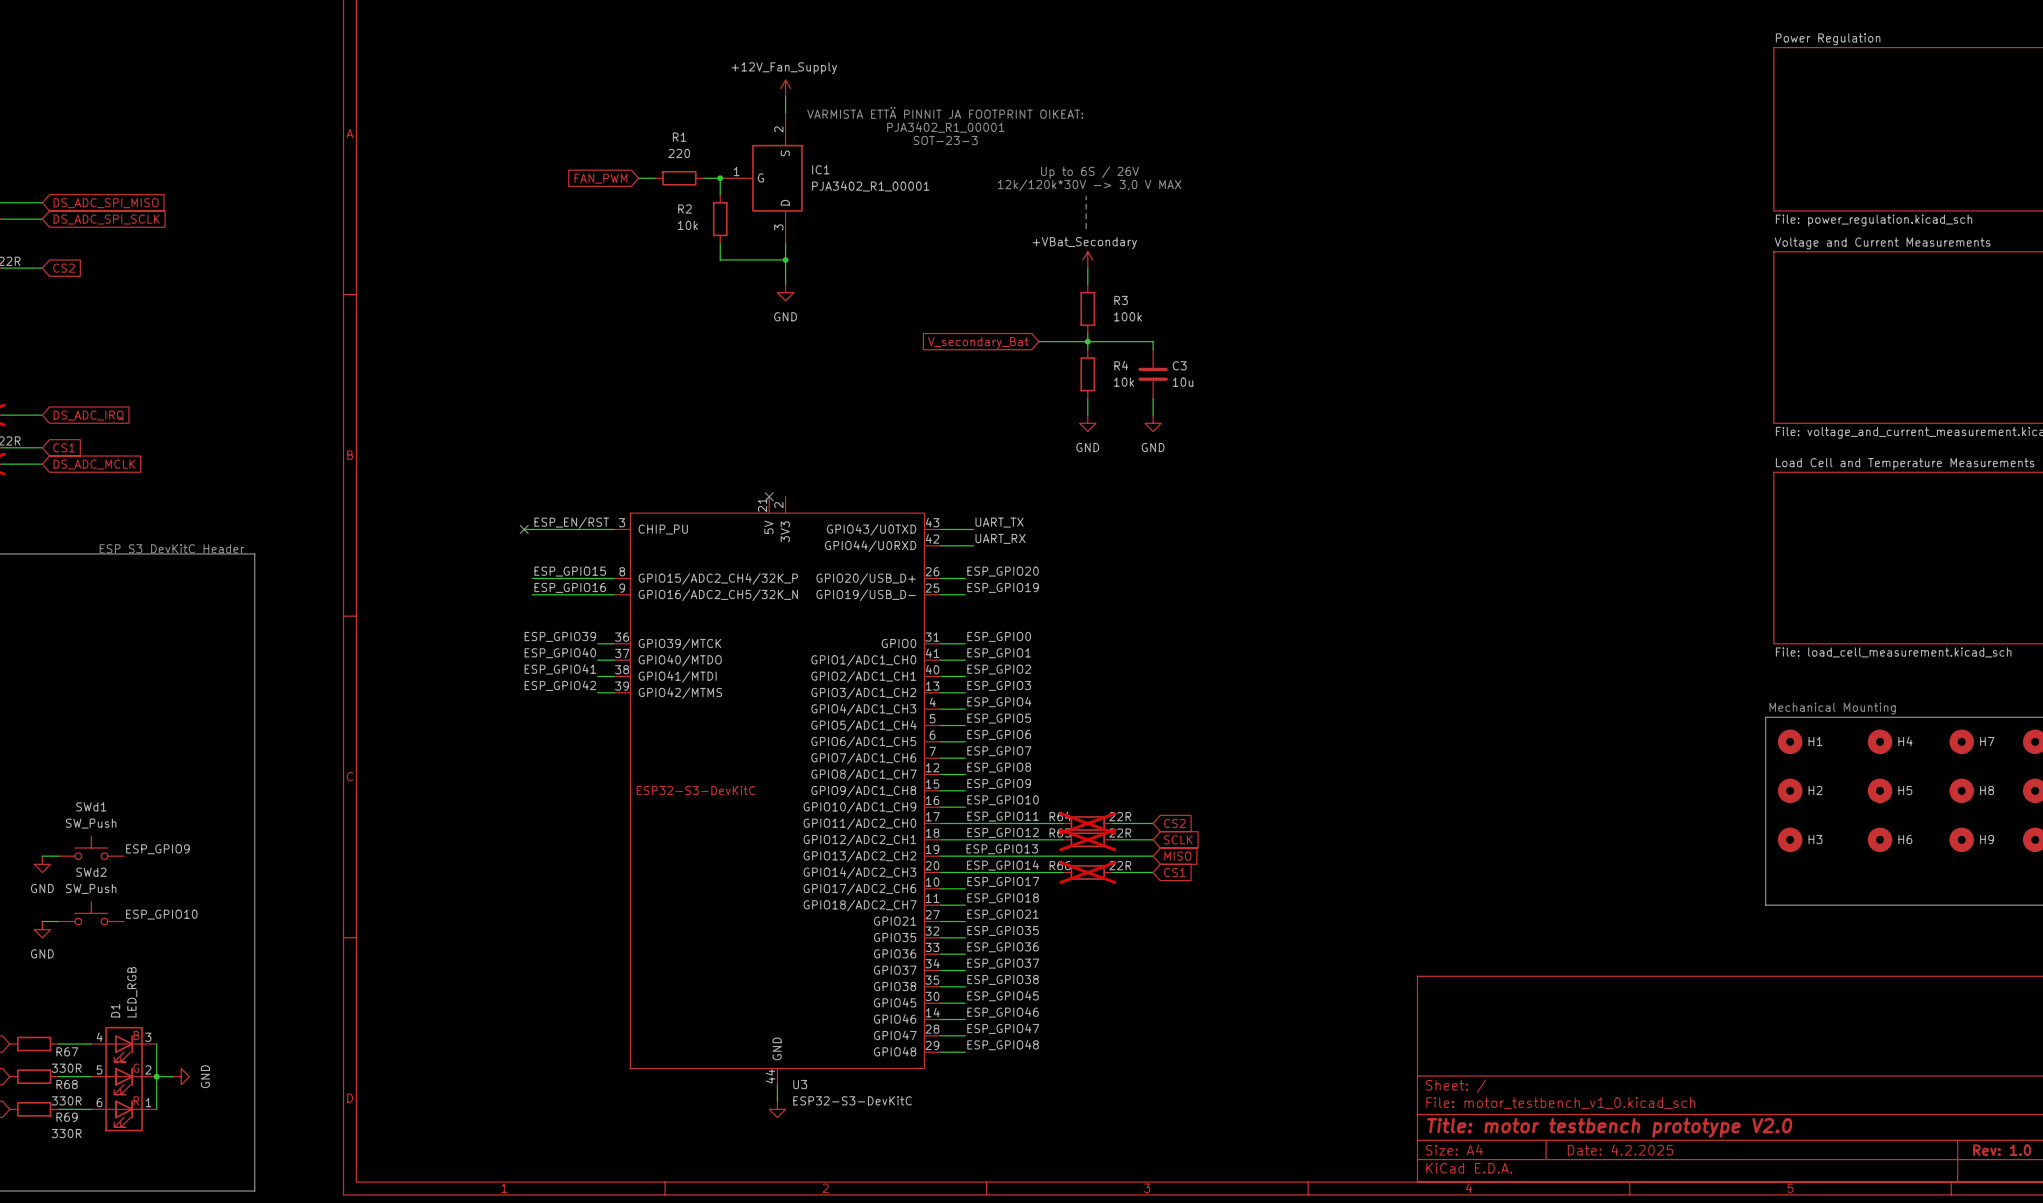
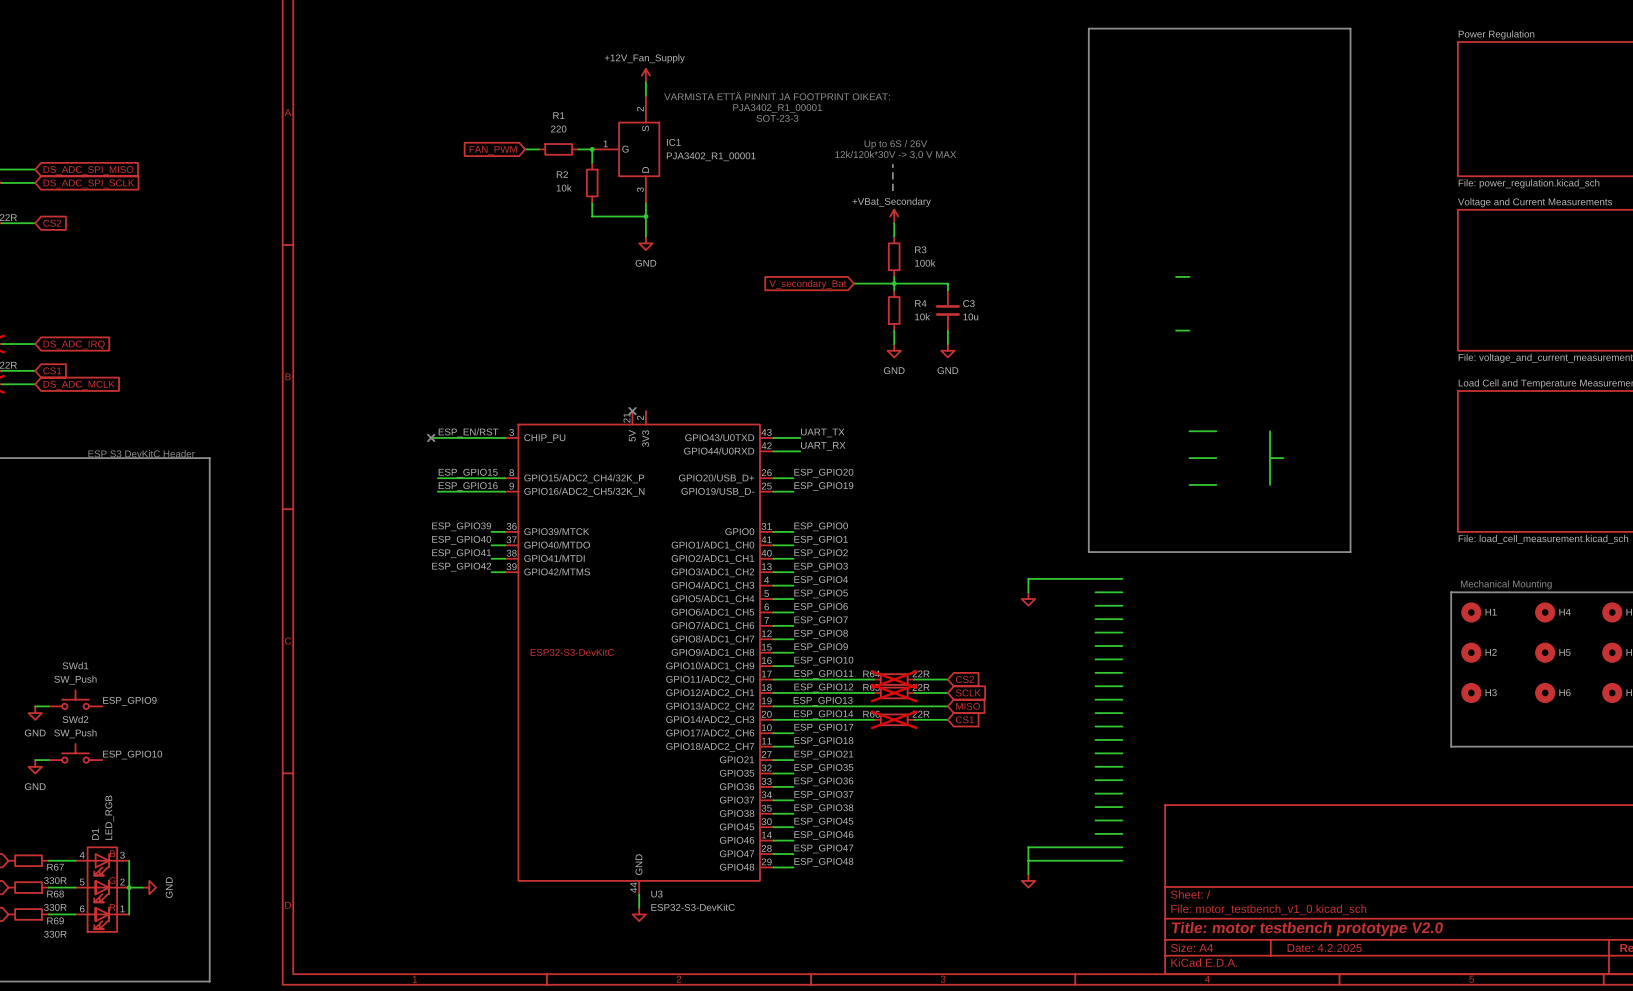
line: none -> (1088, 28) (1350, 28) (1350, 552) (1088, 552) (1088, 28)
wire: none -> (1176, 276) (1189, 276)
wire: none -> (1176, 330) (1189, 330)
wire: none -> (1189, 431) (1216, 431)
wire: none -> (1270, 431) (1270, 484)
wire: none -> (1189, 458) (1216, 458)
wire: none -> (1270, 458) (1283, 458)
wire: none -> (1189, 484) (1216, 484)
wire: none -> (1122, 578) (1028, 578) (1028, 592)
wire: none -> (1095, 592) (1122, 592)
power symbol: none -> (1028, 599)
wire: none -> (1095, 605) (1122, 605)
wire: none -> (1095, 619) (1122, 619)
wire: none -> (1095, 632) (1122, 632)
wire: none -> (1095, 646) (1122, 646)
wire: none -> (1095, 659) (1122, 659)
wire: none -> (1095, 672) (1122, 672)
wire: none -> (1095, 686) (1122, 686)
wire: none -> (1095, 699) (1122, 699)
wire: none -> (1095, 713) (1122, 713)
wire: none -> (1095, 726) (1122, 726)
wire: none -> (1095, 739) (1122, 739)
wire: none -> (1095, 753) (1122, 753)
wire: none -> (1095, 766) (1122, 766)
wire: none -> (1095, 780) (1122, 780)
wire: none -> (1095, 793) (1122, 793)
wire: none -> (1095, 807) (1122, 807)
wire: none -> (1095, 820) (1122, 820)
wire: none -> (1095, 833) (1122, 833)
wire: none -> (1122, 847) (1028, 847) (1028, 874)
wire: none -> (1028, 860) (1122, 860)
power symbol: none -> (1028, 880)

